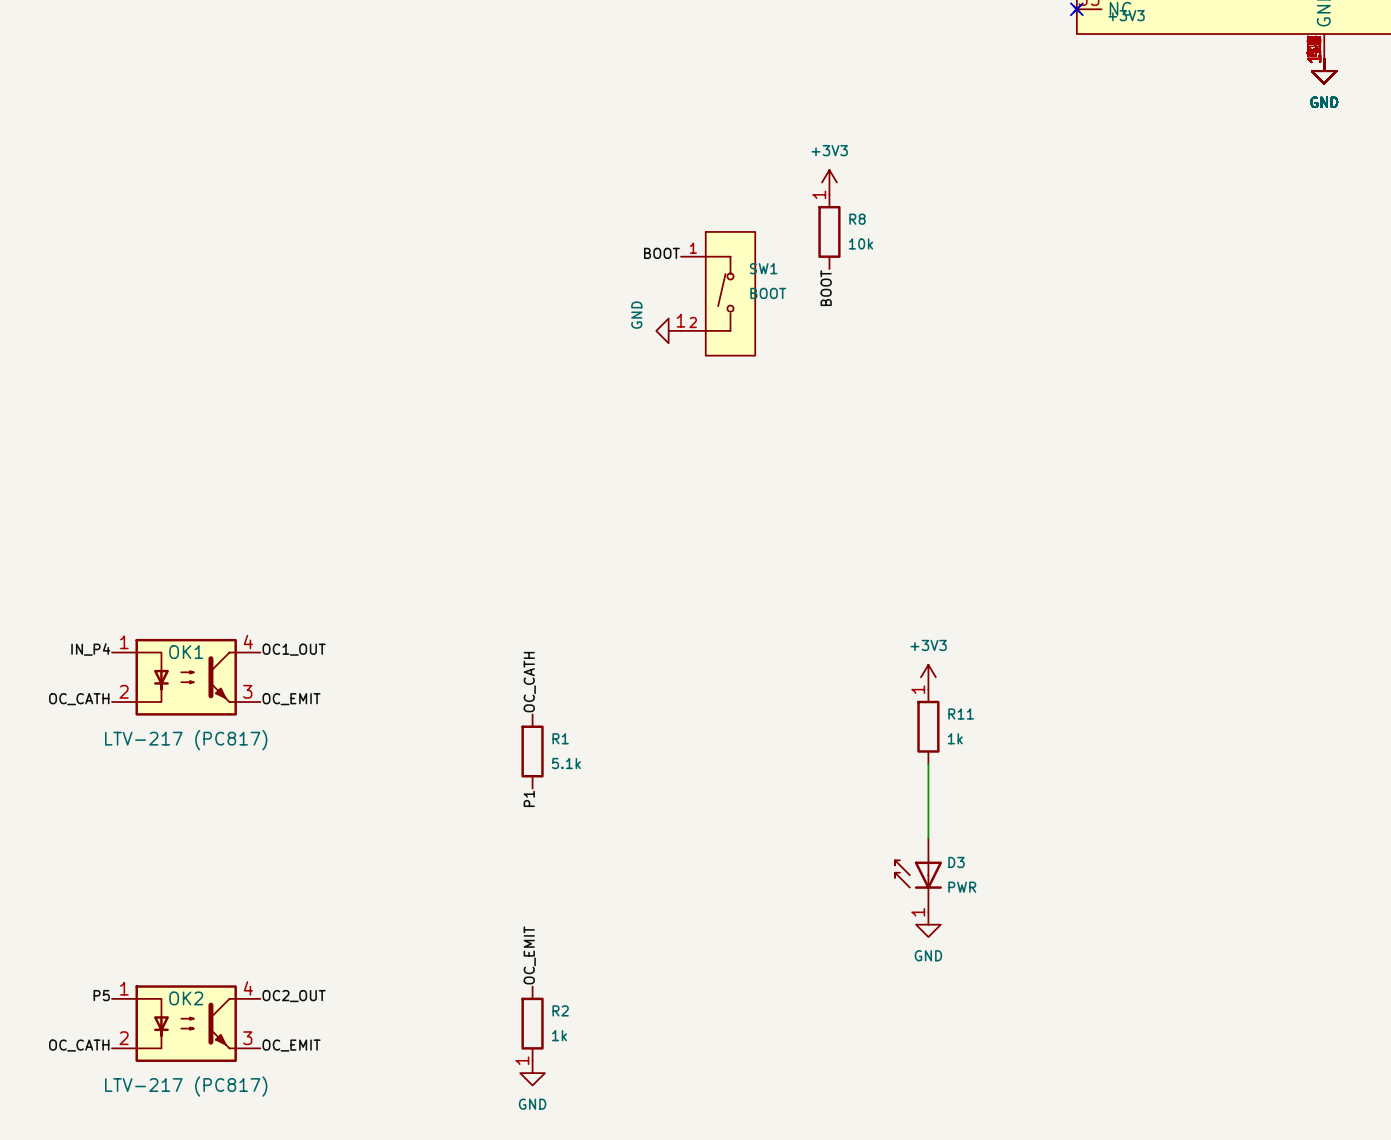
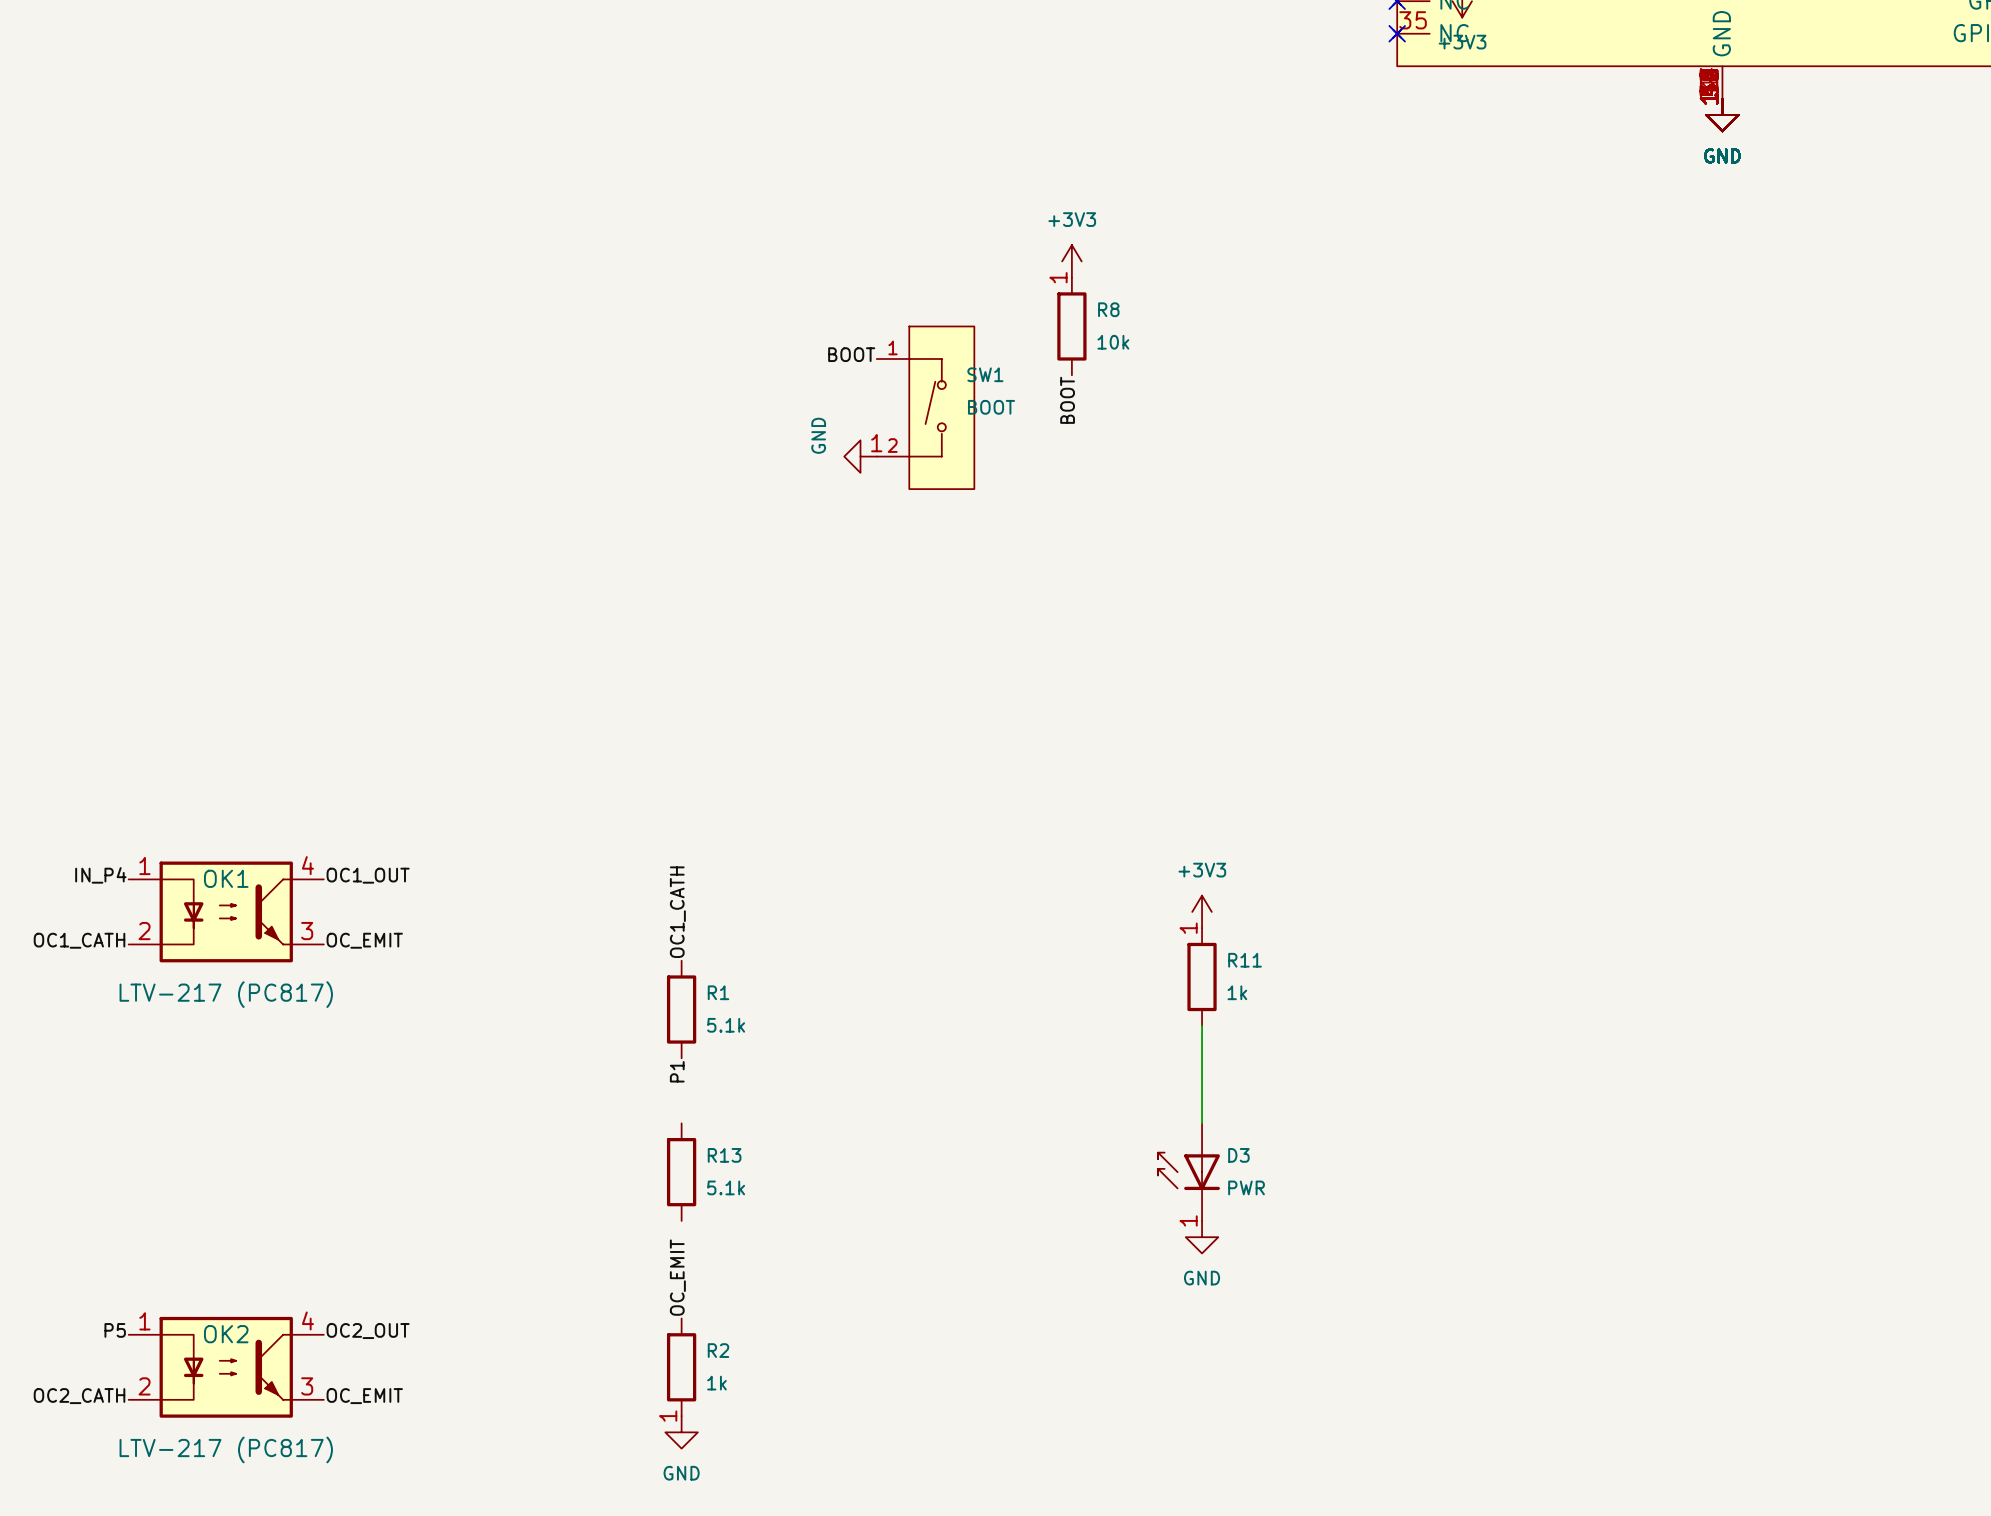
label: OC_CATH (529, 682) -> OC1_CATH (677, 912)
label: OC_CATH (79, 699) -> OC1_CATH (79, 940)
R13: none -> 5.1k (681, 1172)
label: OC_CATH (79, 1045) -> OC2_CATH (79, 1396)

